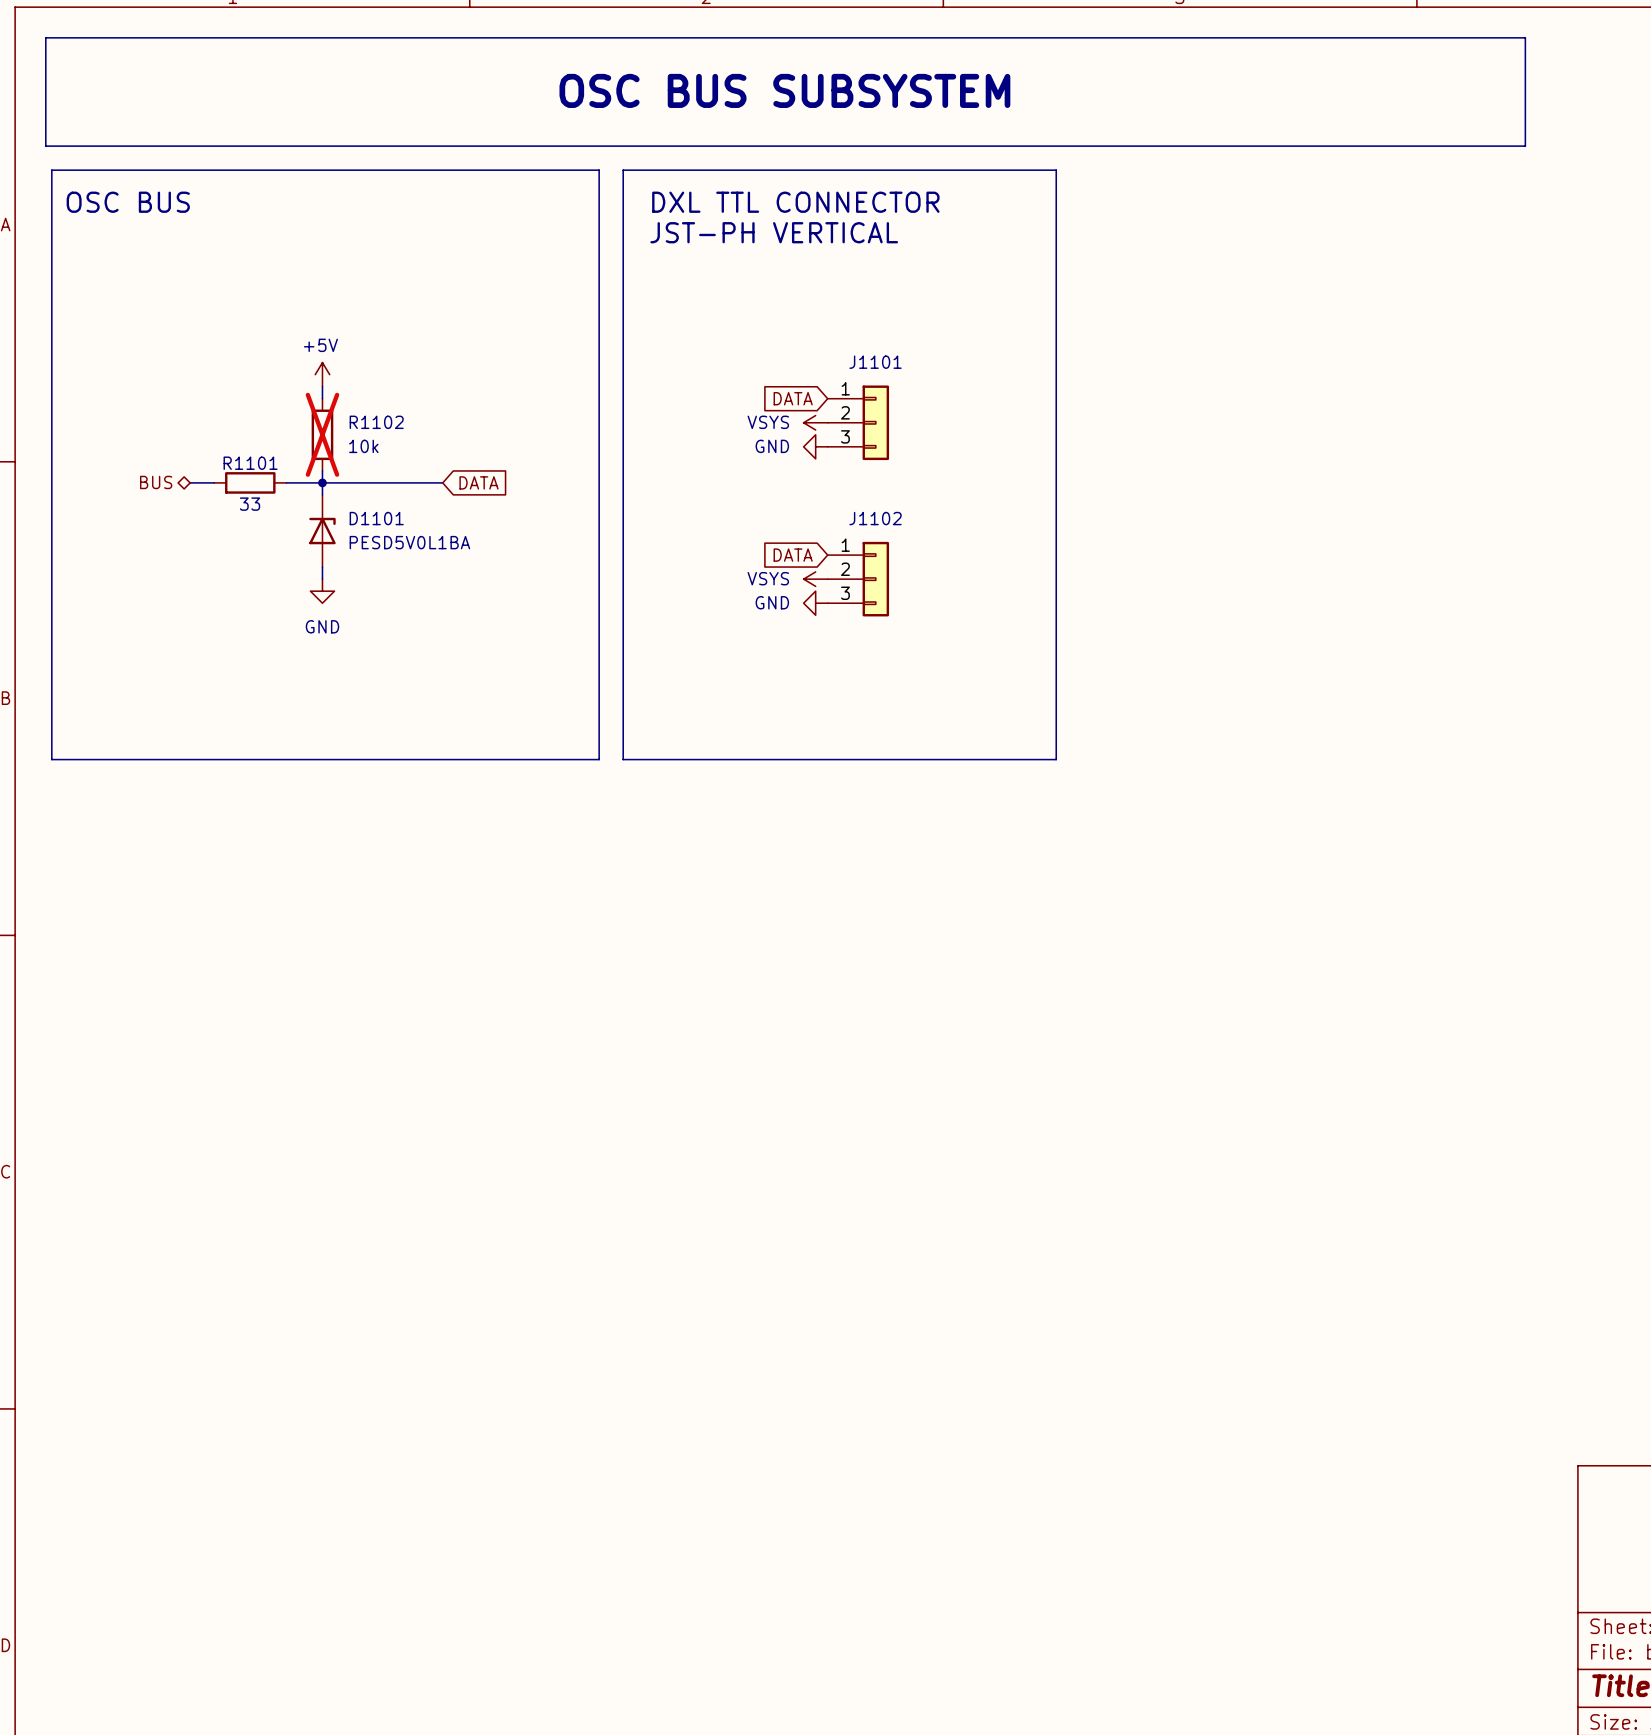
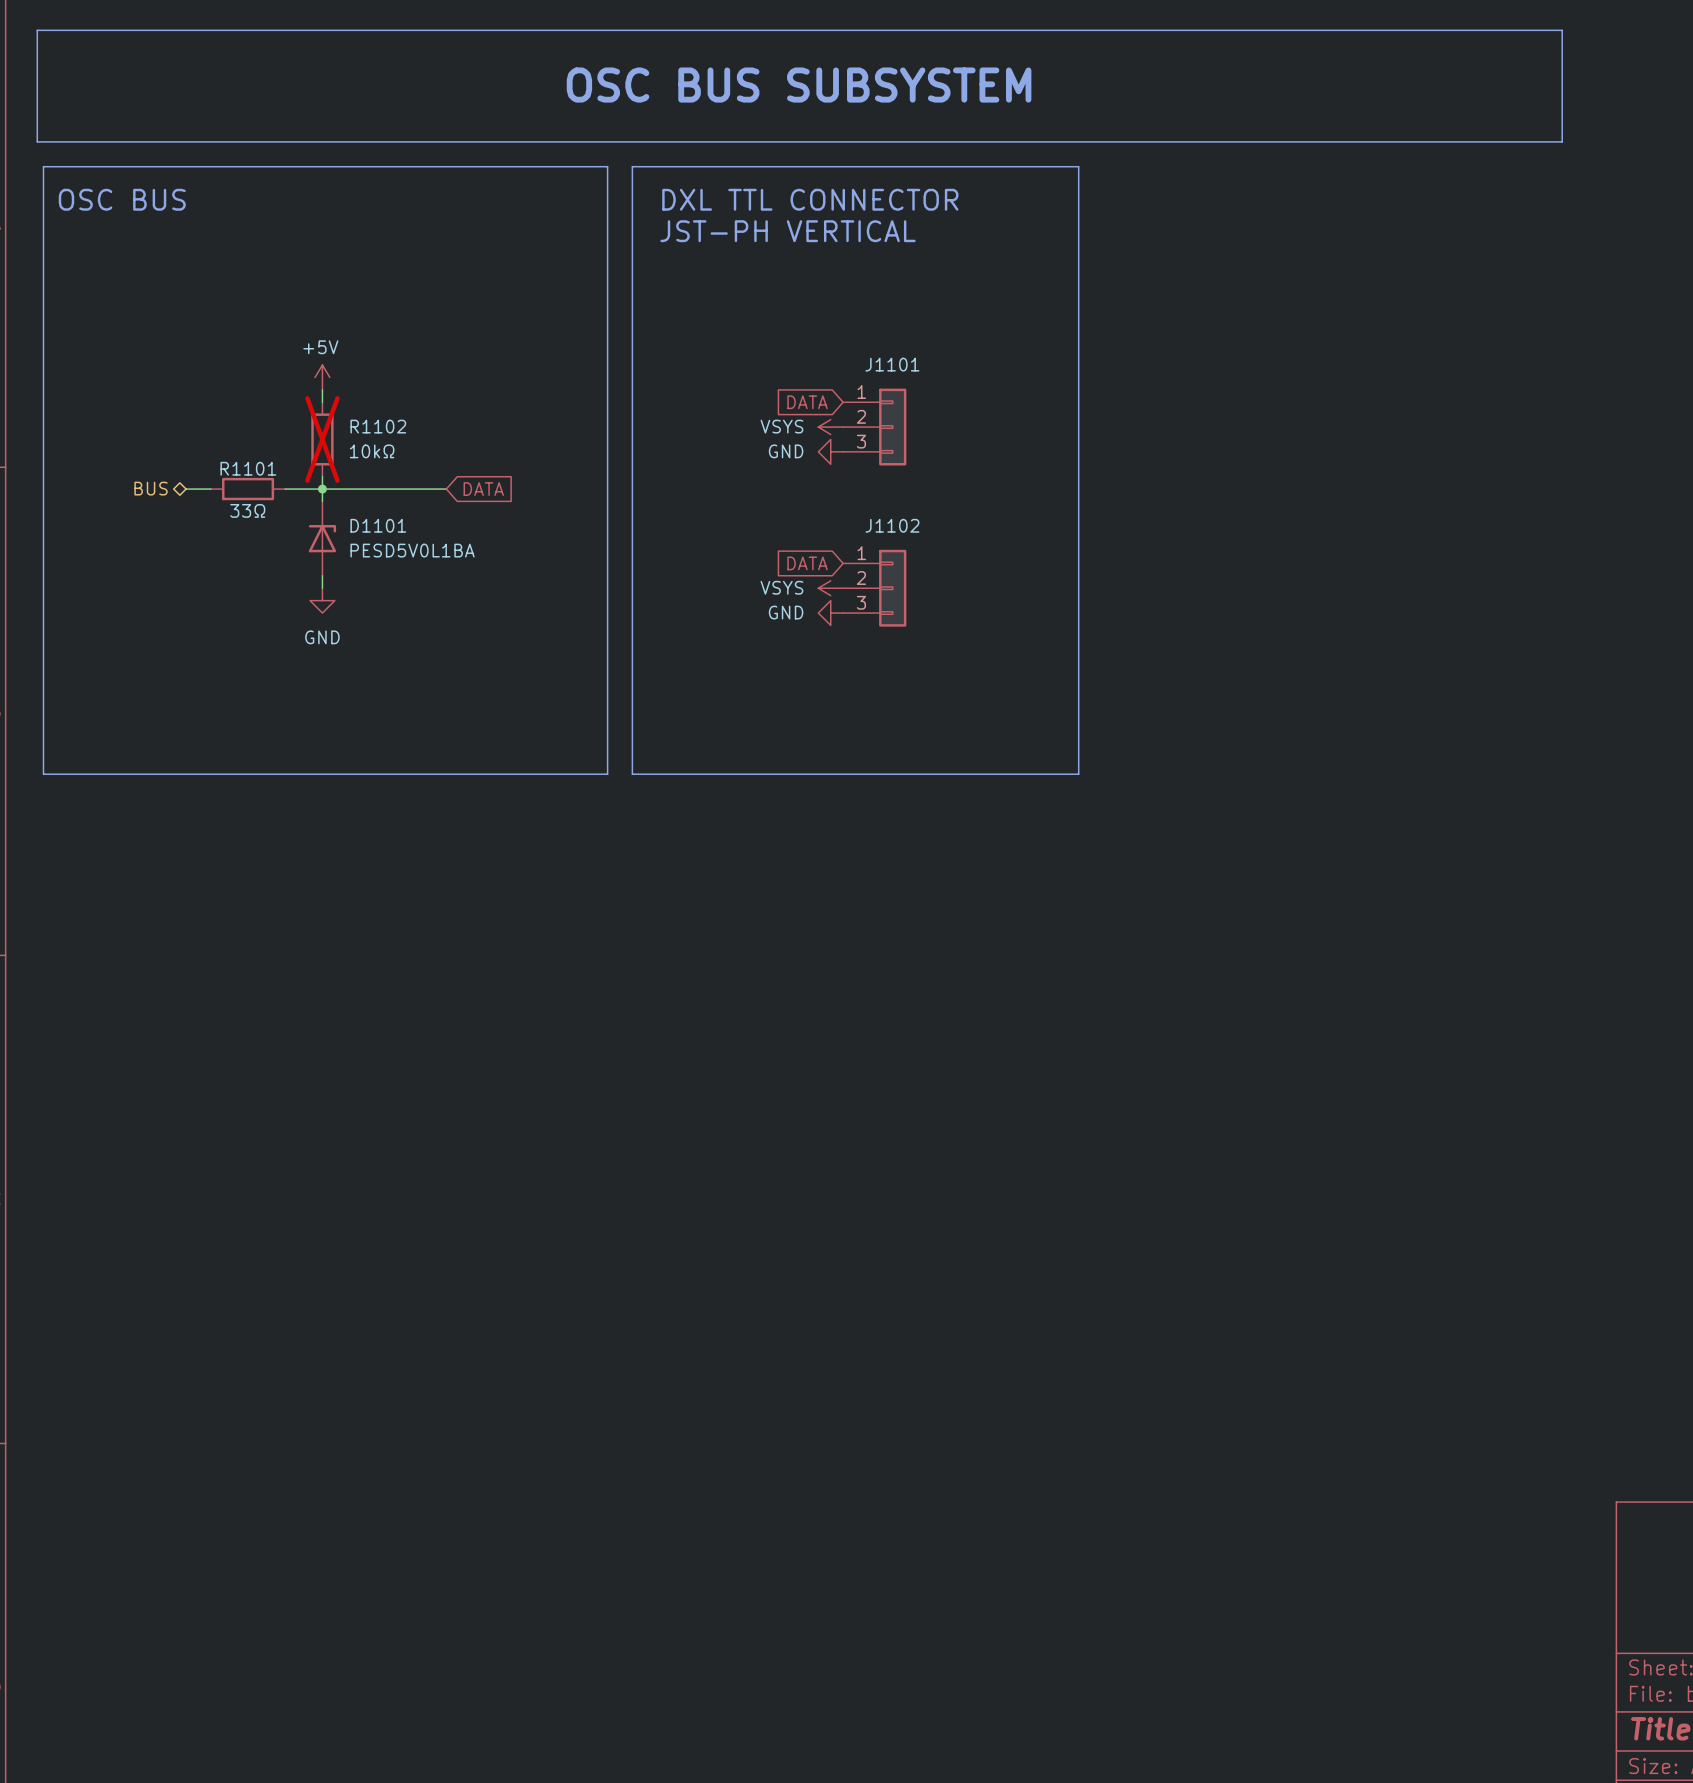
R1102 value: 10k (363, 446) -> 10kΩ (372, 451)
R1101 value: 33 (250, 504) -> 33Ω (247, 510)

